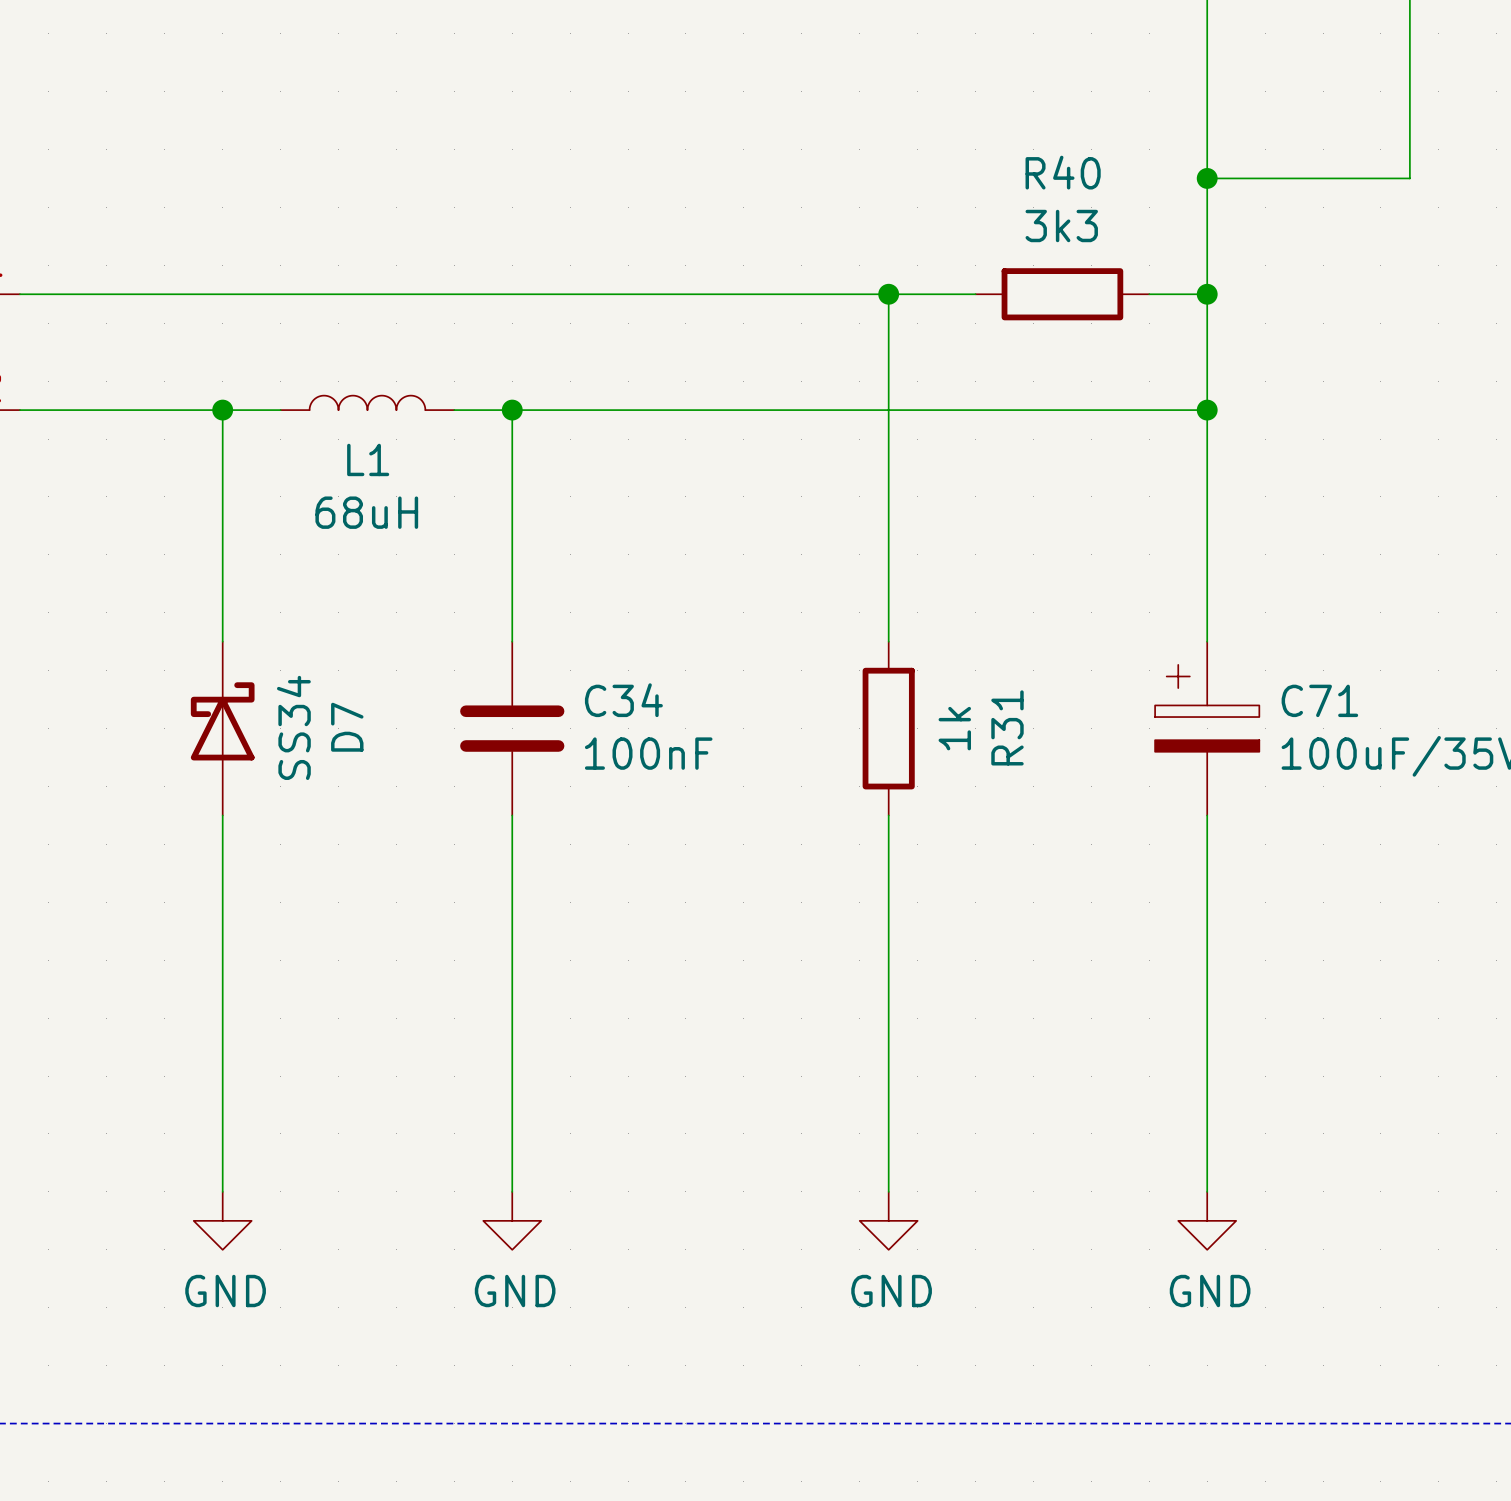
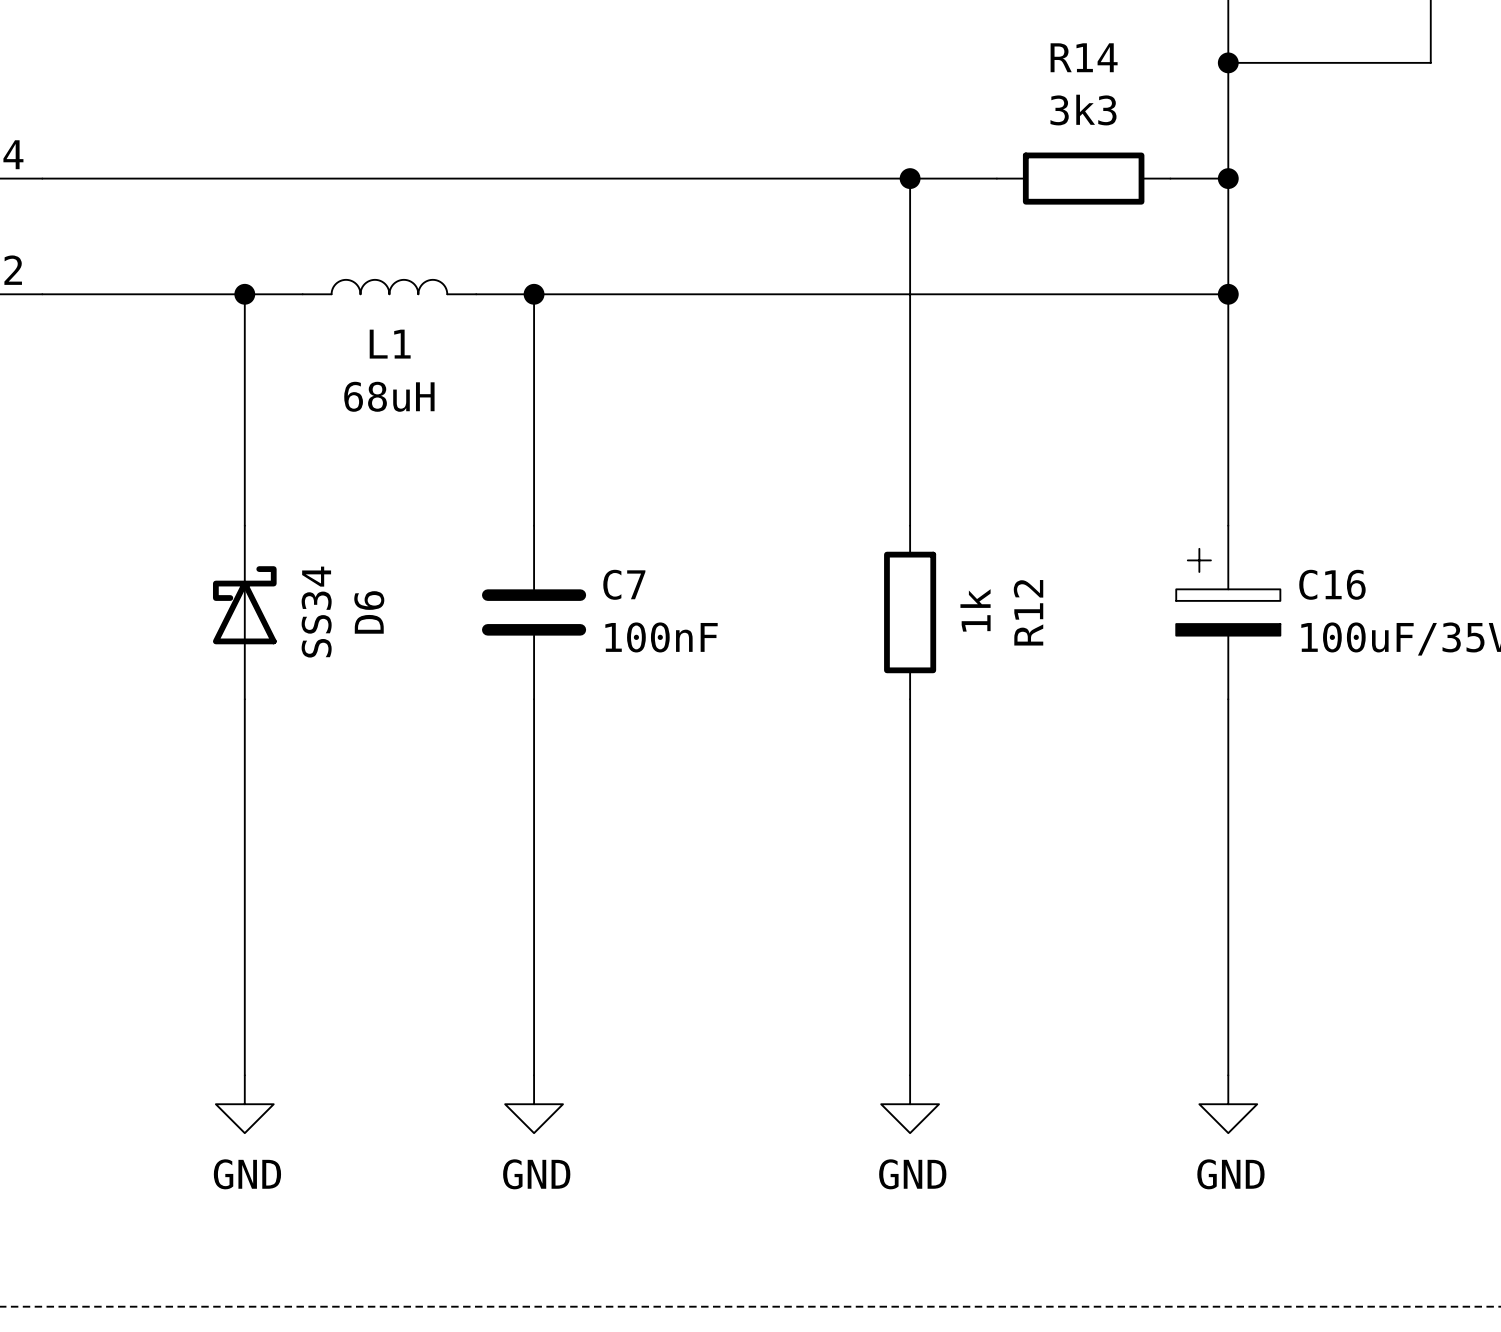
R40 name: R40 (1063, 172) -> R14 (1084, 57)
C34 name: C34 (623, 700) -> C7 (624, 584)
C71 name: C71 (1319, 700) -> C16 (1332, 584)
D7 name: D7 (347, 727) -> D6 (369, 612)
R31 name: R31 (1007, 727) -> R12 (1028, 612)

